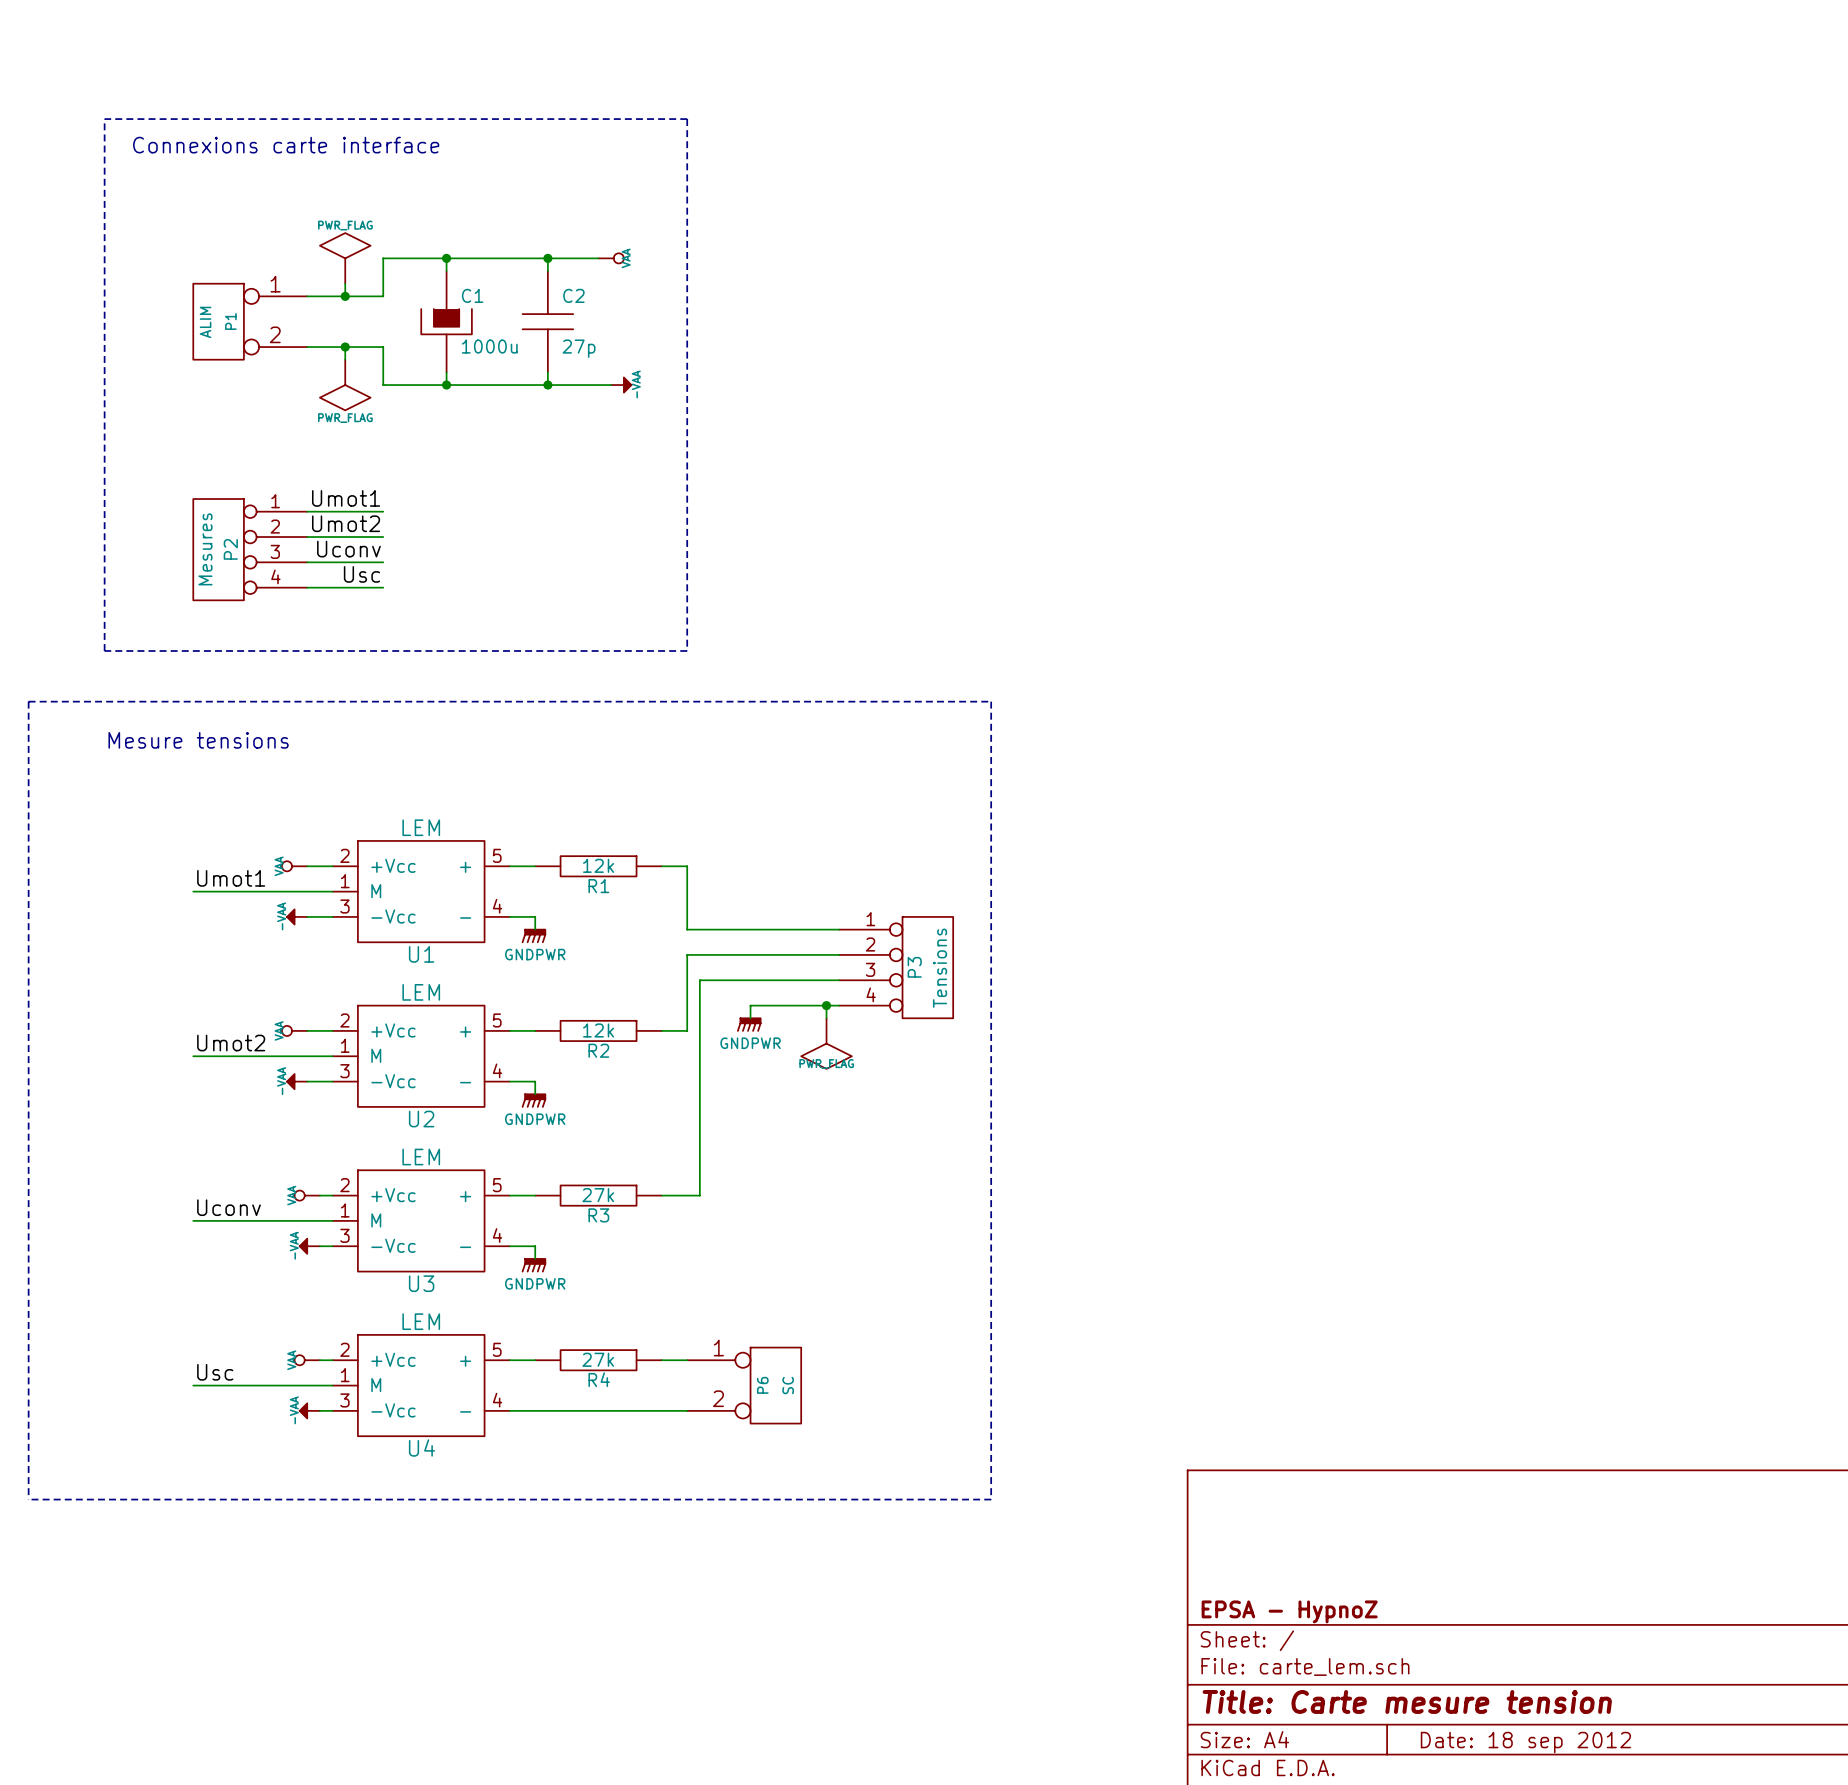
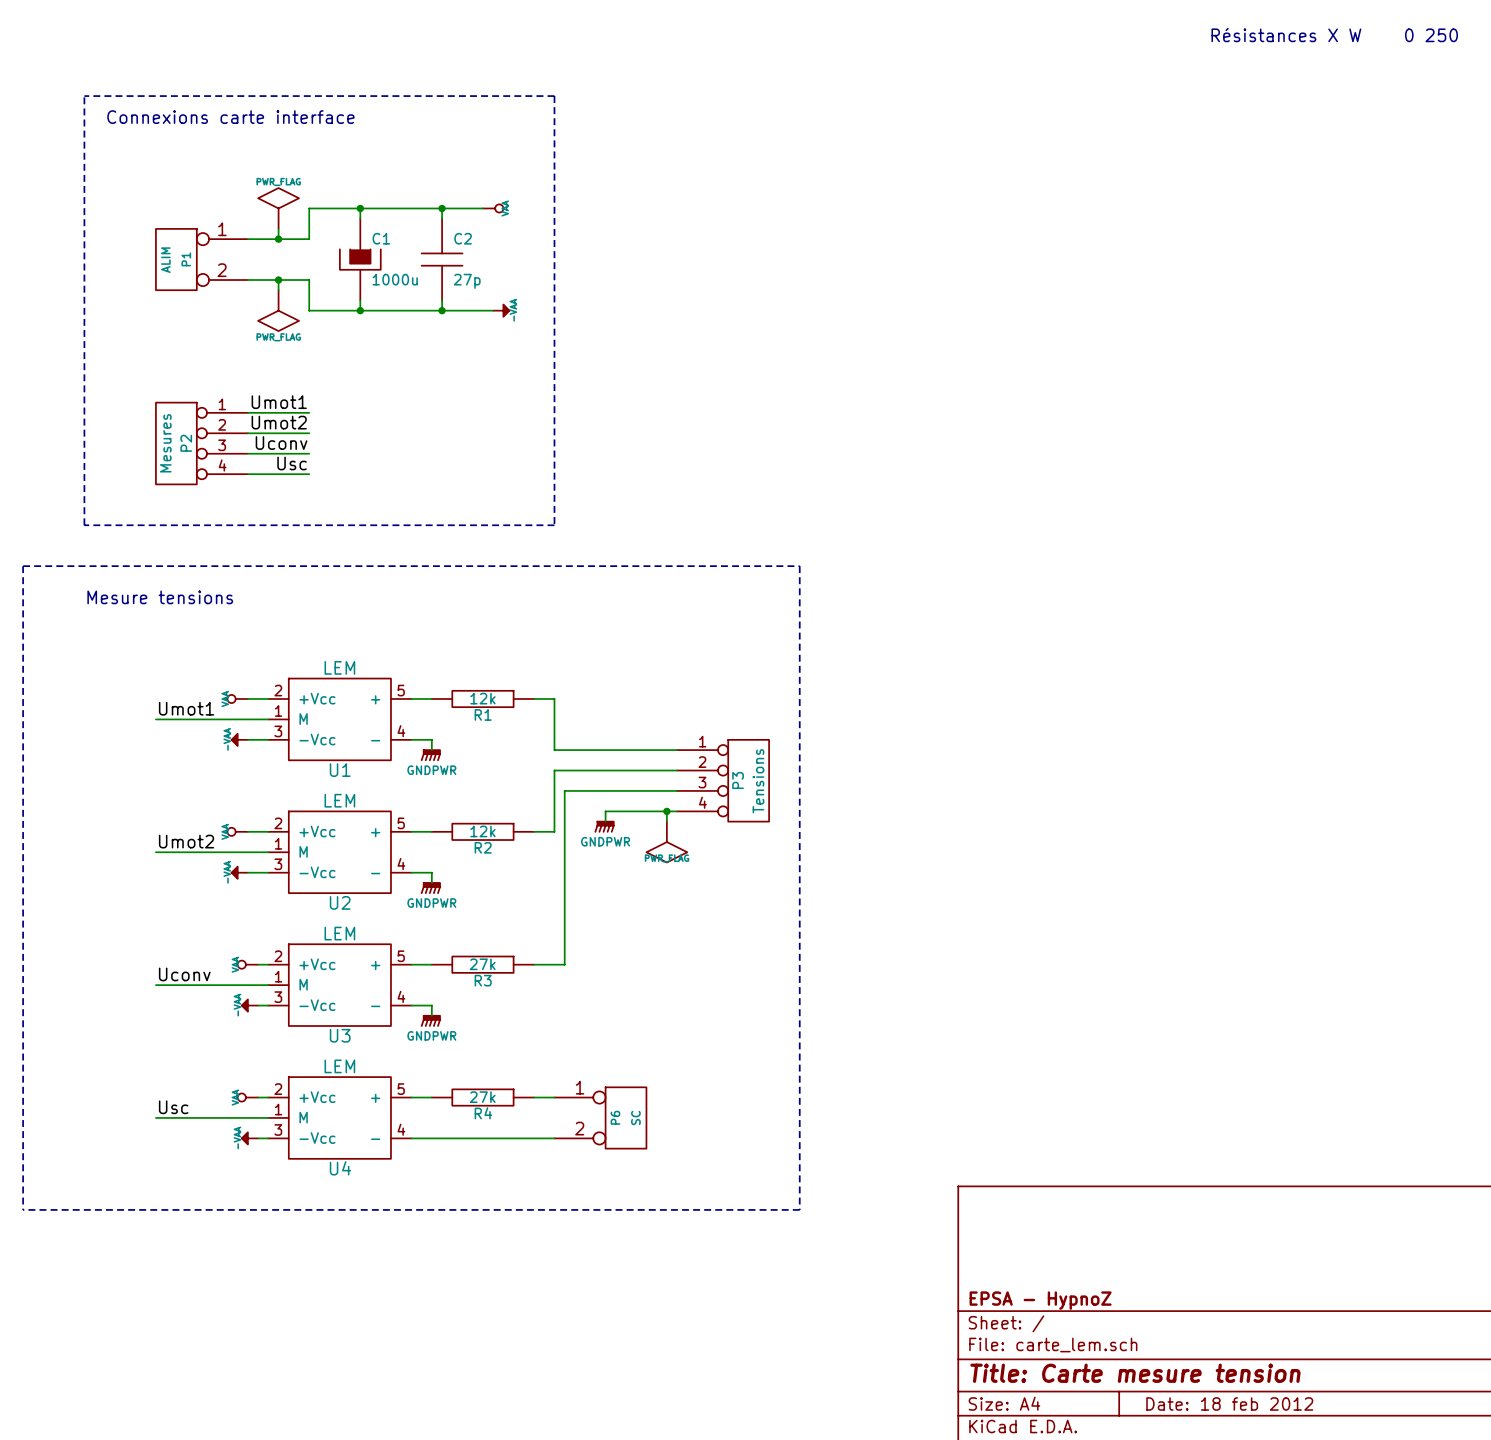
text: none -> Résistances X W (1286, 35)
text: none -> 0 250 (1431, 35)
title block: Date: 18 sep 2012 (1525, 1742) -> Date: 18 feb 2012 (1229, 1403)

